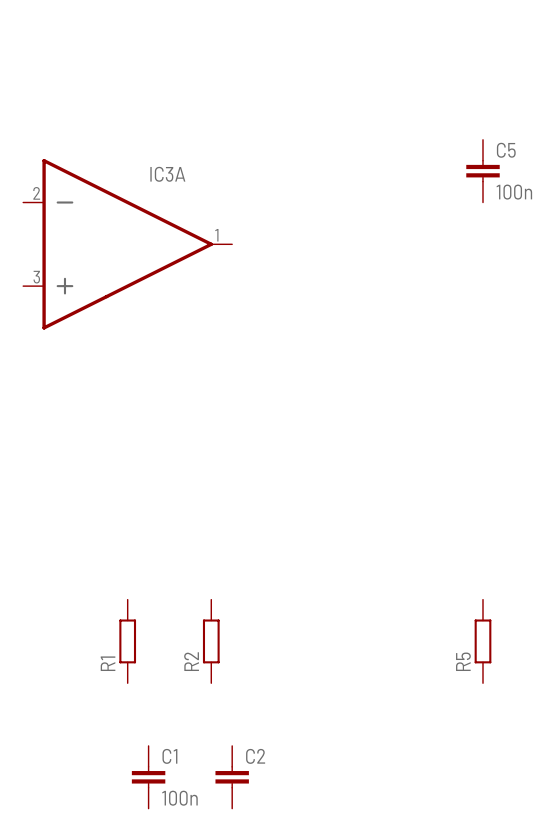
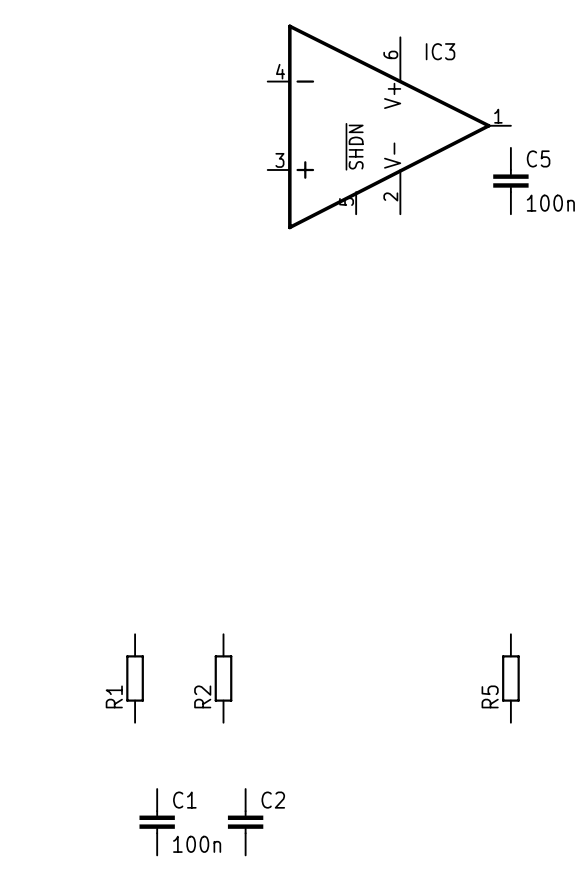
IC3: none -> (389, 126)
IC3A: (127, 244) -> none

